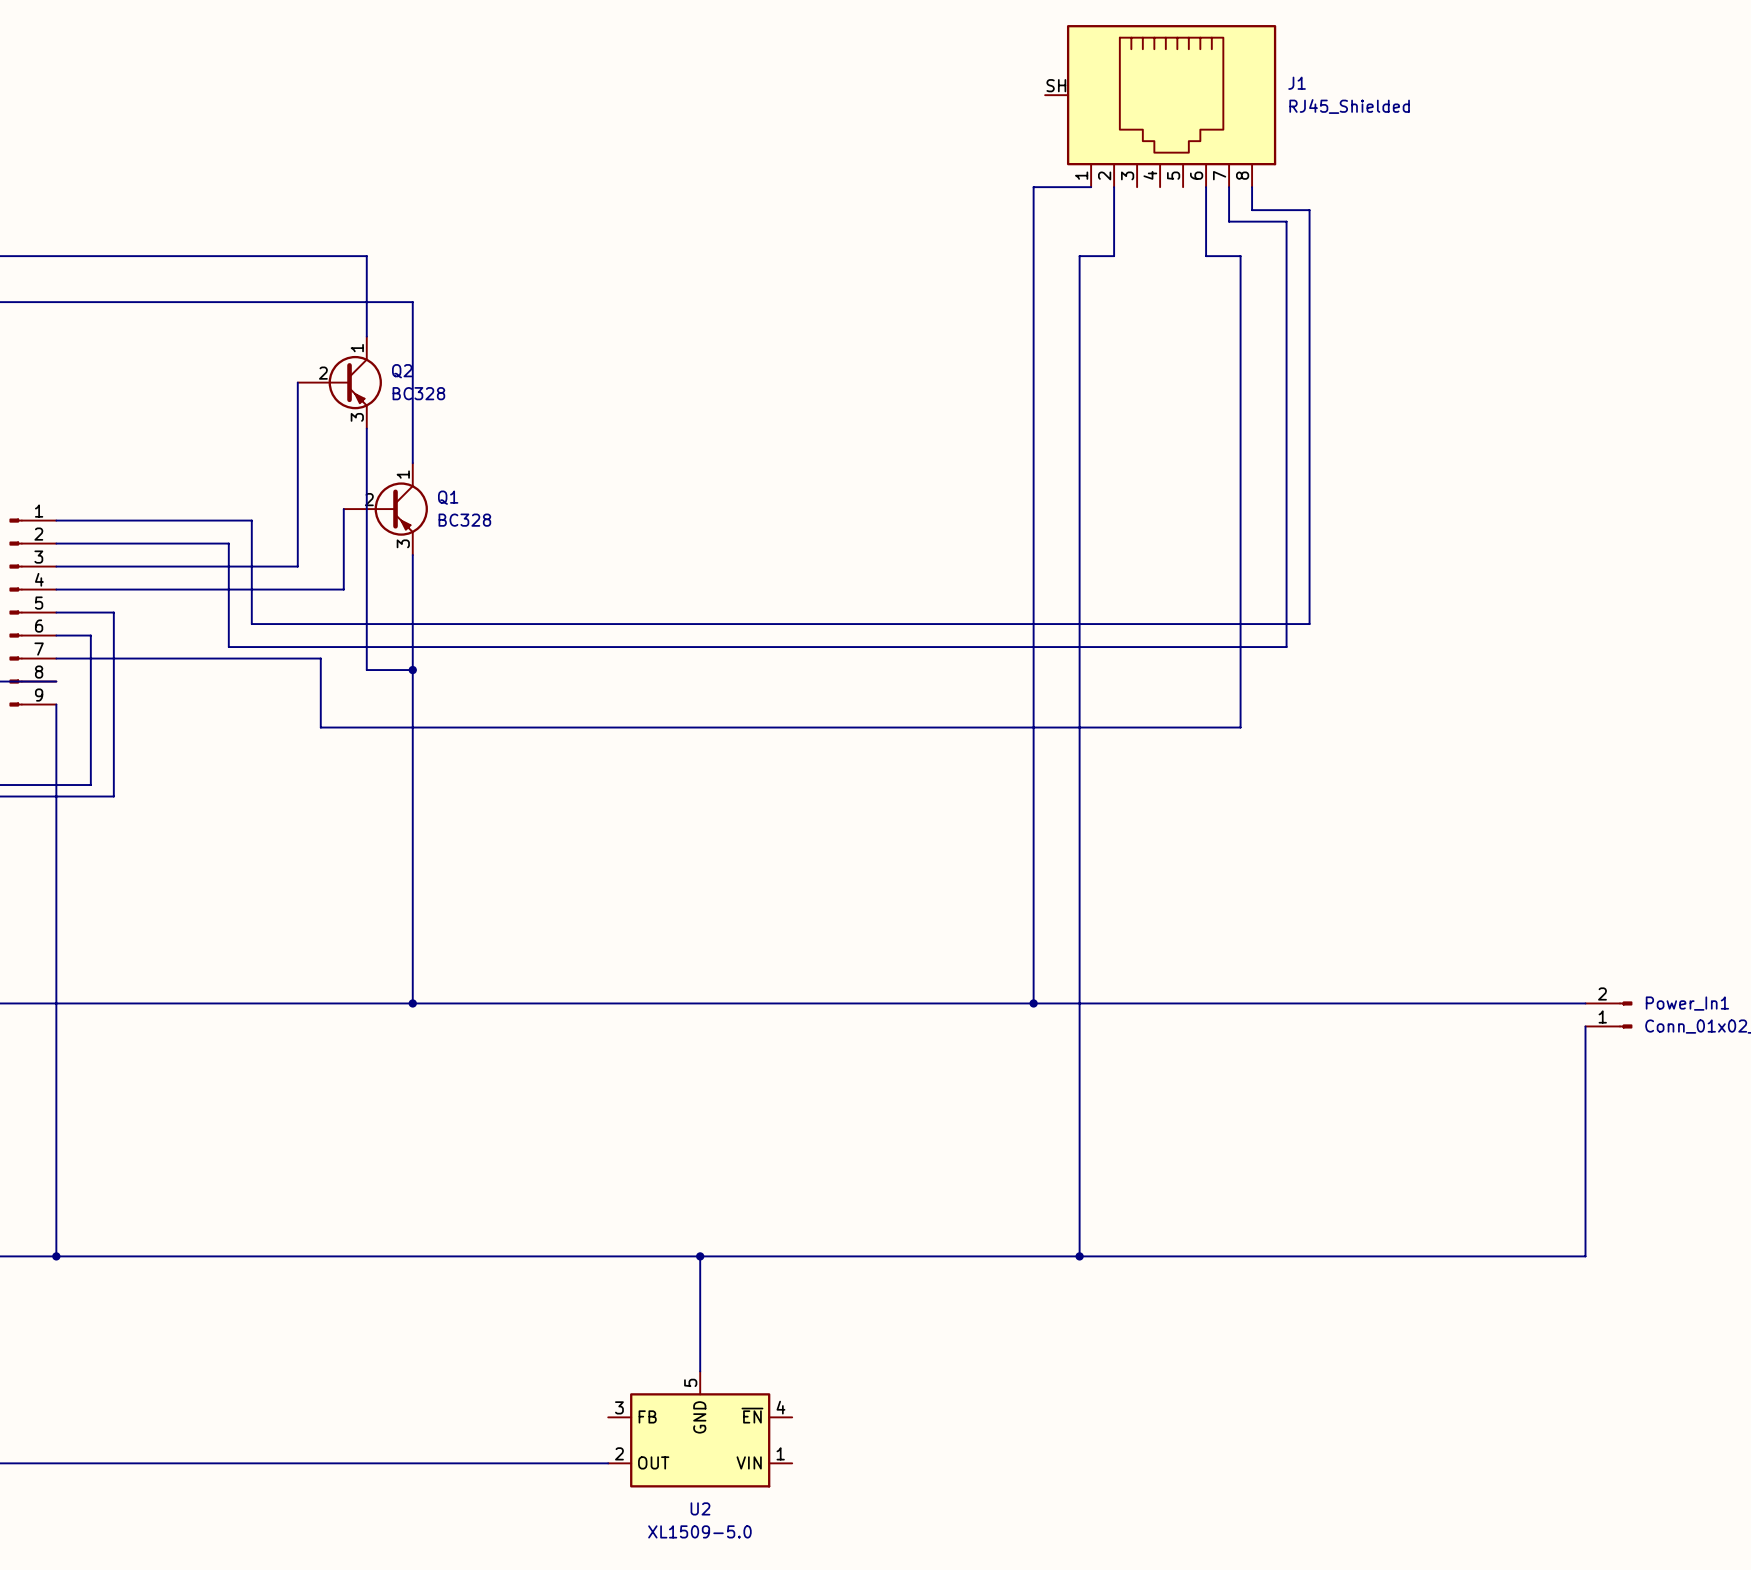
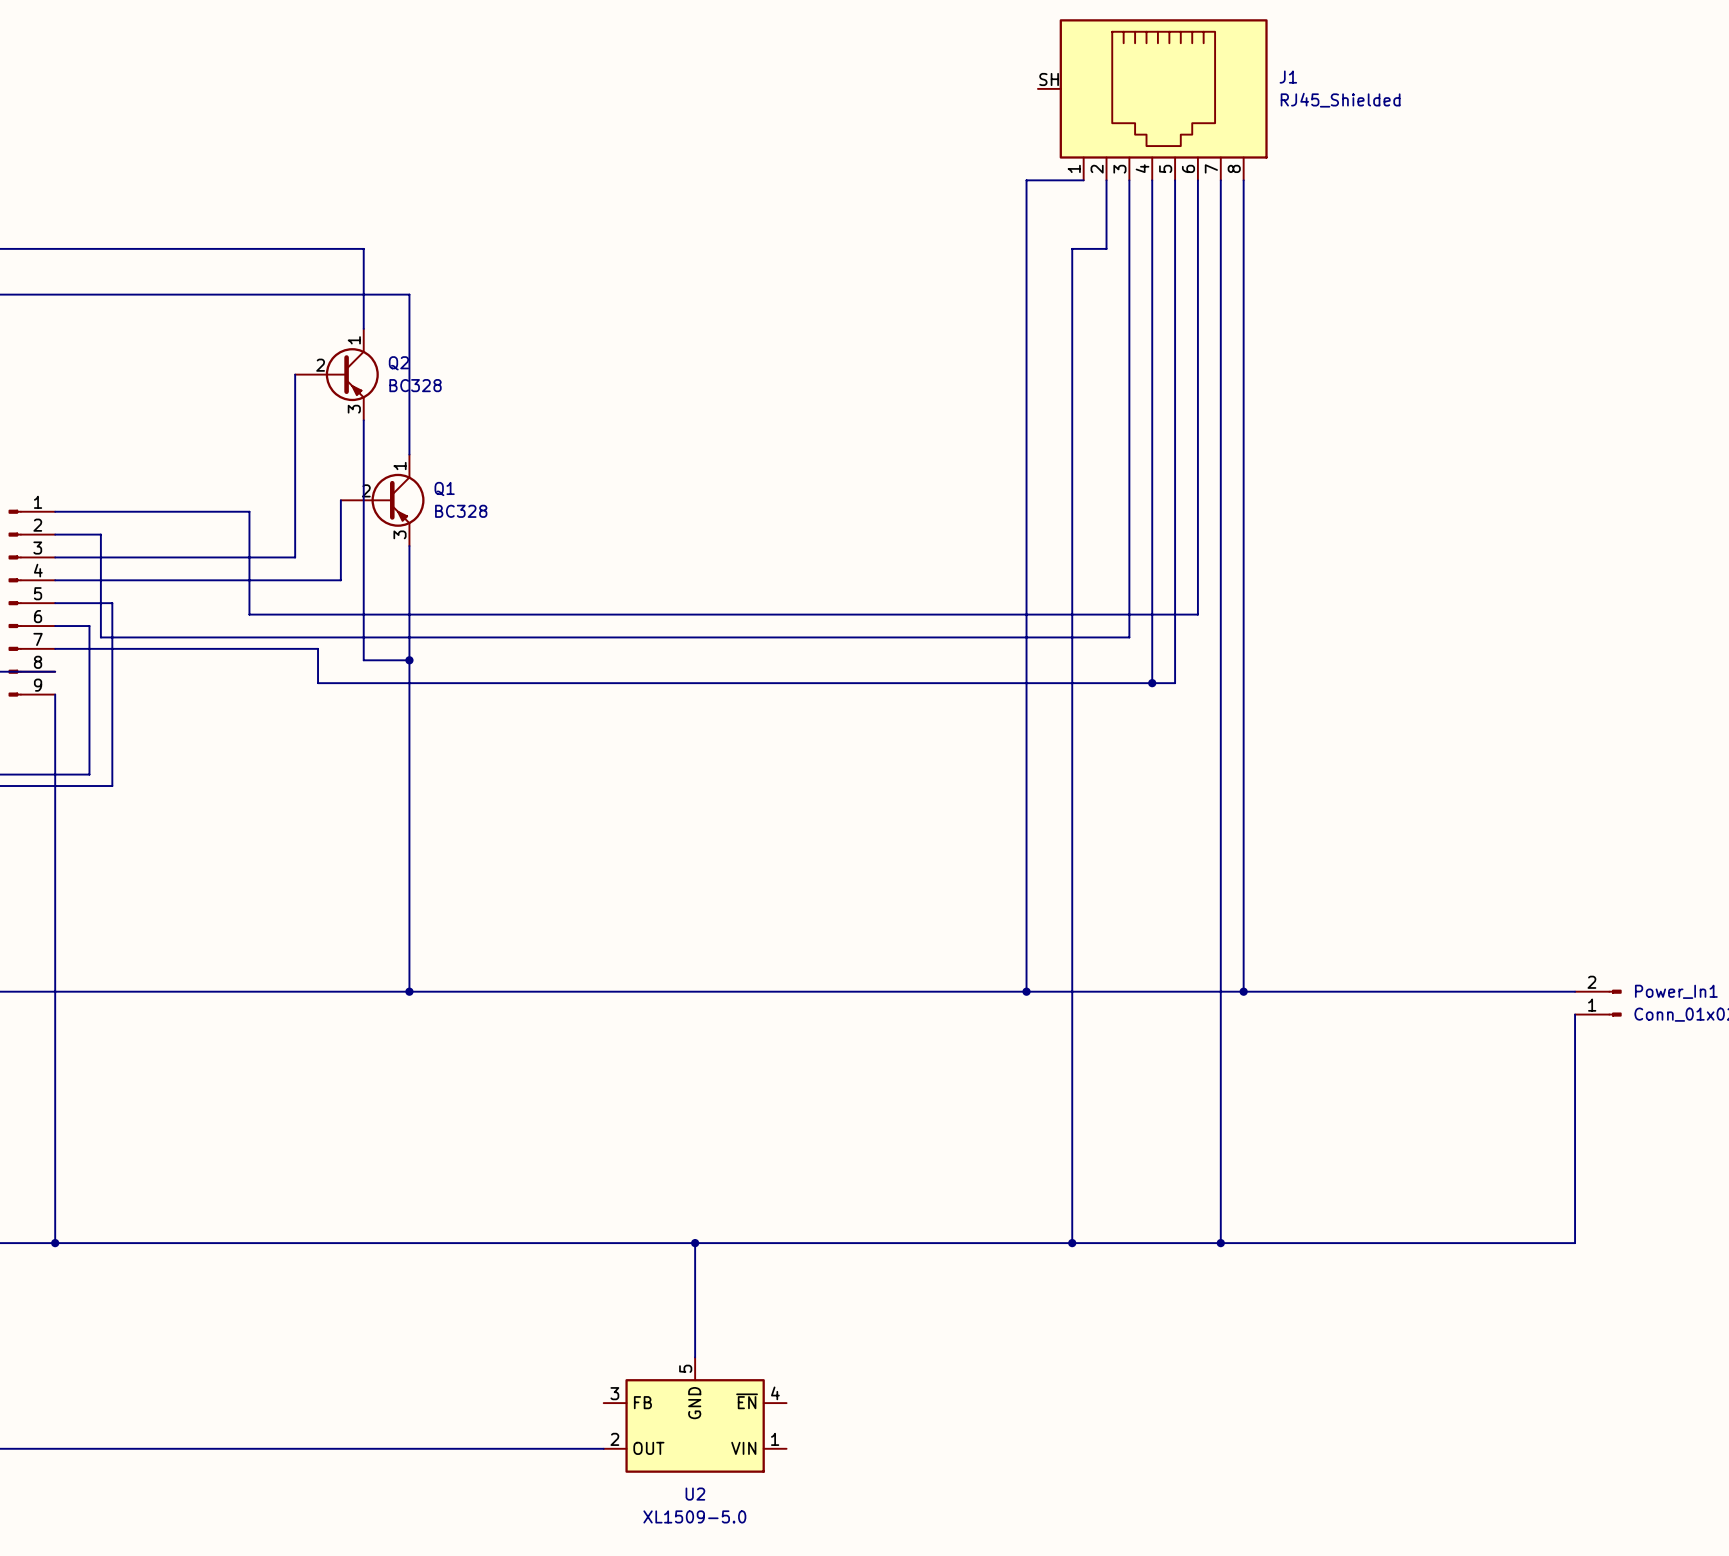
wire: none -> (1152, 180) (1152, 683)
wire: (1252, 210) (1309, 210) (1309, 624) (1206, 624) -> (1197, 248) (1197, 614)
wire: none -> (1243, 203) (1243, 991)
wire: (1229, 221) (1286, 221) (1286, 647) (1137, 647) -> (1129, 180) (1129, 637)
wire: none -> (1220, 214) (1220, 1243)
wire: (1206, 256) (1240, 256) (1240, 727) (320, 727) (320, 693) -> (1175, 180) (1175, 683) (318, 683)
wire: (102, 543) (228, 543) (228, 647) -> (100, 534) (100, 637) (226, 637)
junction: none -> (1152, 683)
junction: none -> (1243, 991)
junction: none -> (1220, 1243)

